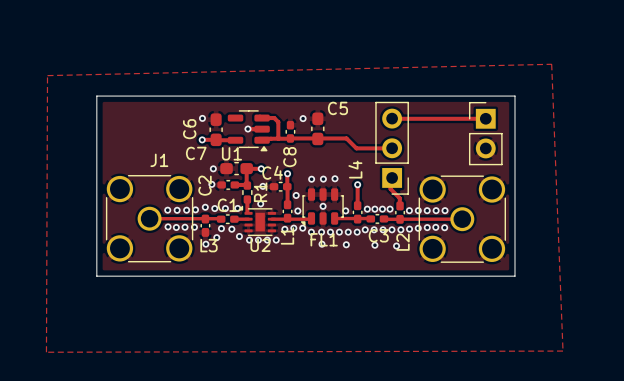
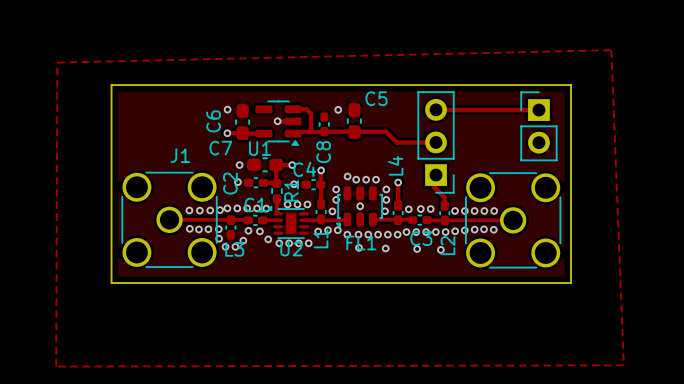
via: (334, 178) -> none
via: (323, 179) -> none
via: none -> (356, 179)
via: none -> (366, 179)
via: none -> (376, 179)
via: none -> (336, 189)
via: none -> (386, 189)
via: (296, 195) -> none
via: none -> (336, 199)
via: none -> (386, 199)
via: (260, 203) -> none
via: none -> (287, 204)
via: none -> (297, 204)
via: none -> (307, 204)
via: (205, 207) -> none
via: none -> (227, 208)
via: none -> (237, 208)
via: (214, 208) -> none
via: none -> (247, 208)
via: (225, 208) -> none
via: none -> (257, 208)
via: none -> (420, 209)
via: none -> (430, 209)
via: (374, 209) -> none
via: (382, 209) -> none
via: (390, 209) -> none
via: none -> (219, 238)
via: none -> (225, 246)
via: none -> (235, 246)
via: (205, 244) -> none

